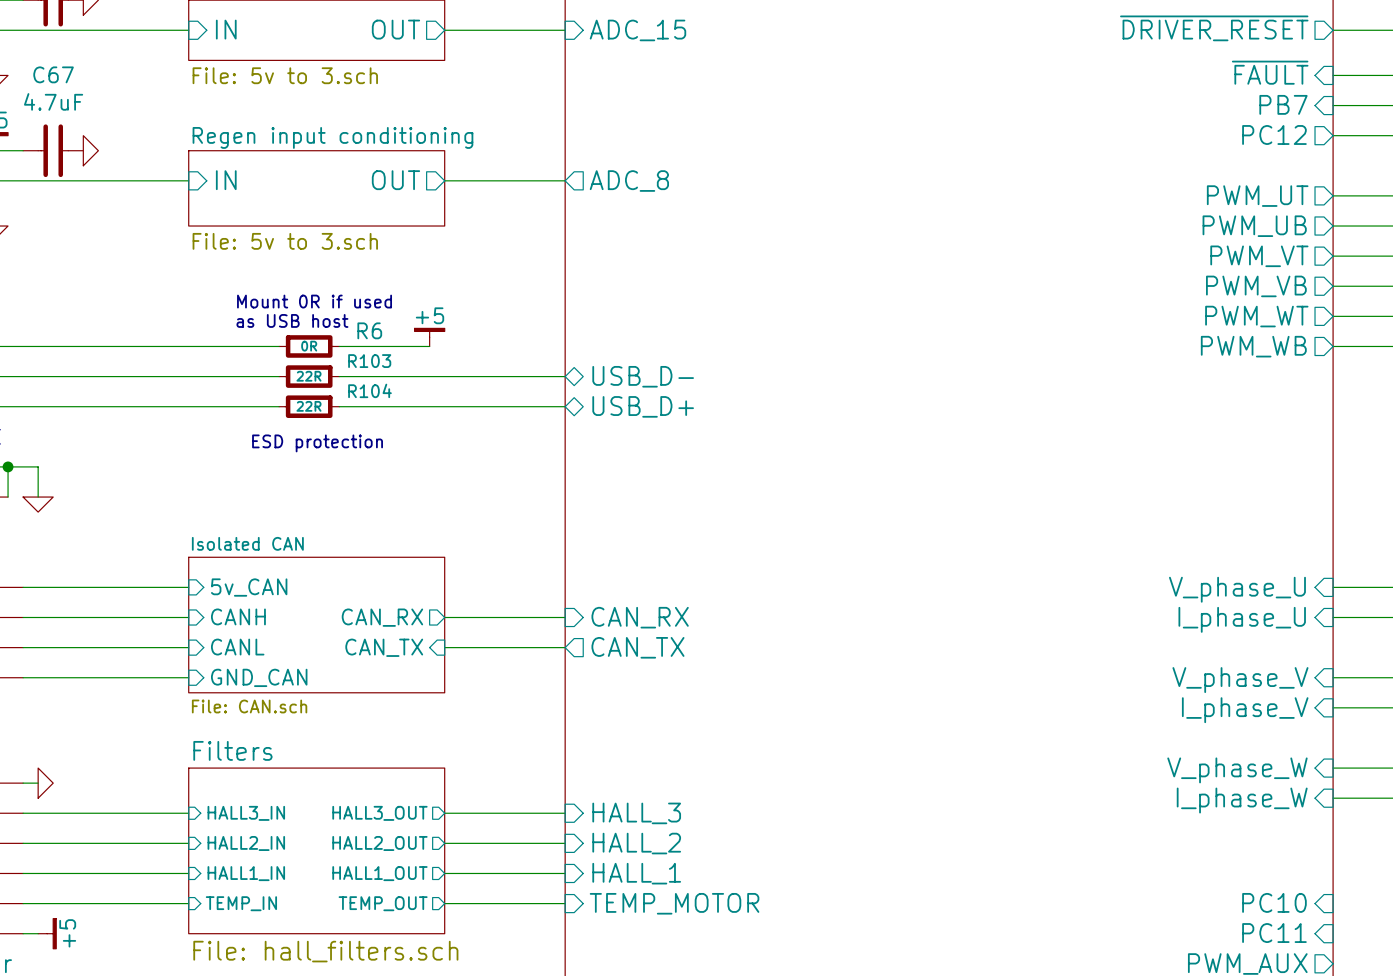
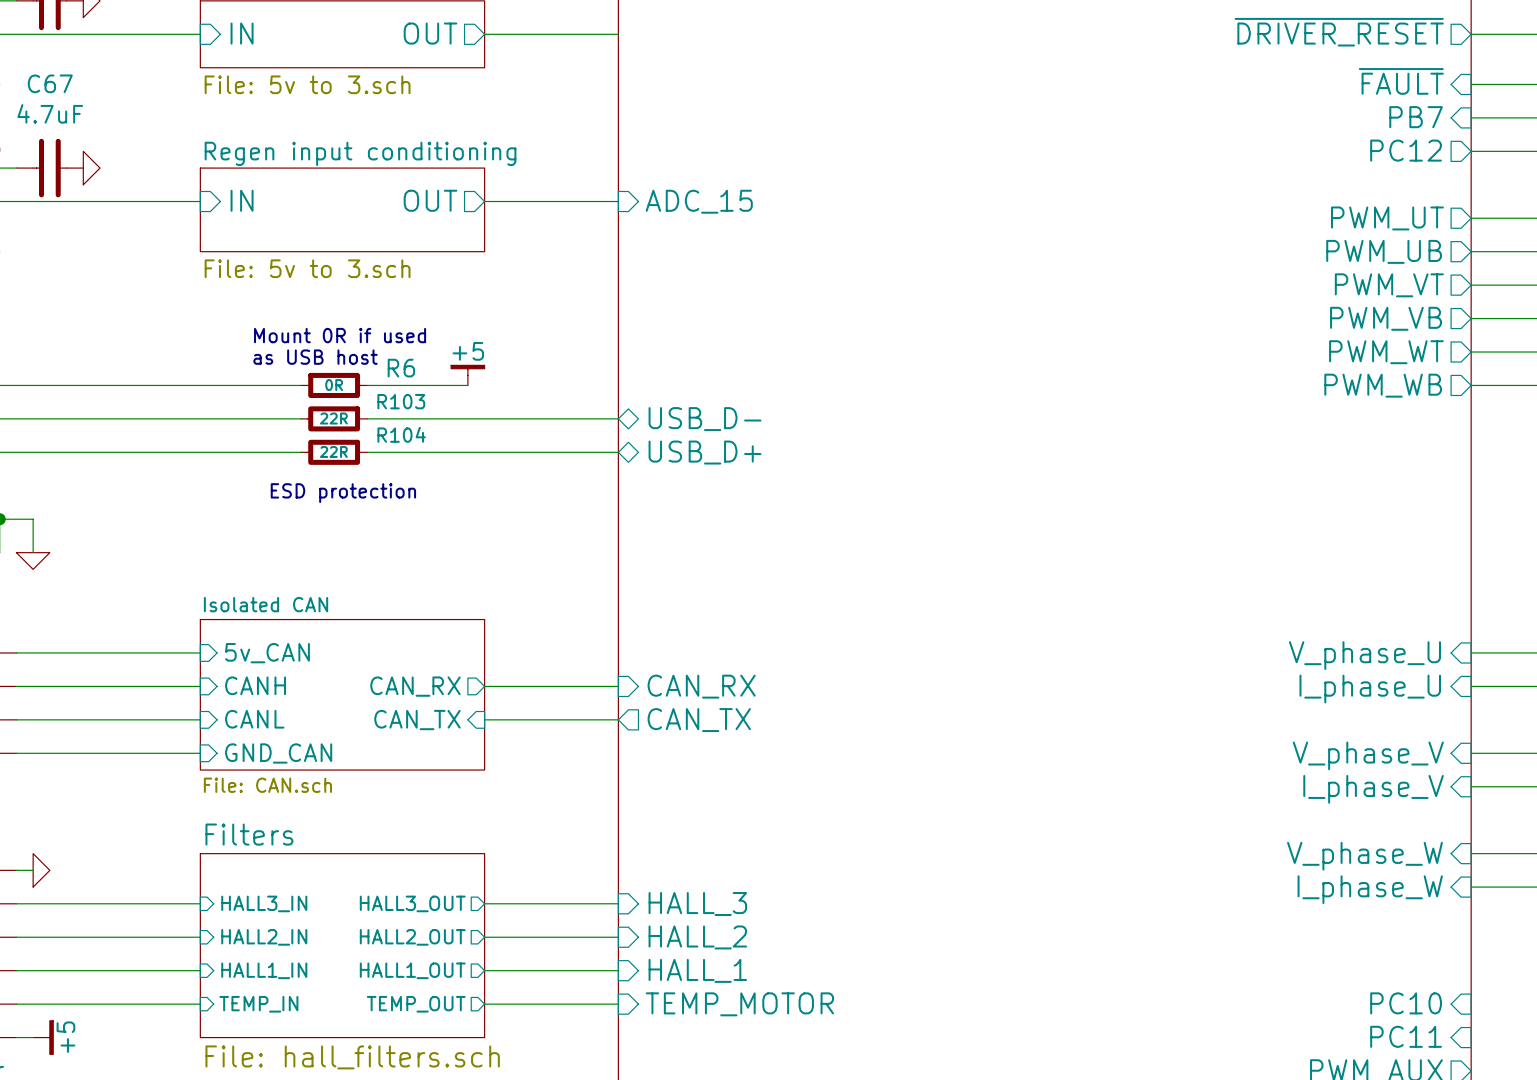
sheet pin: ADC_15 (637, 30) -> none
sheet pin shape: output (629, 181) -> input (699, 201)
sheet pin: ADC_8 (629, 181) -> ADC_15 (699, 201)

